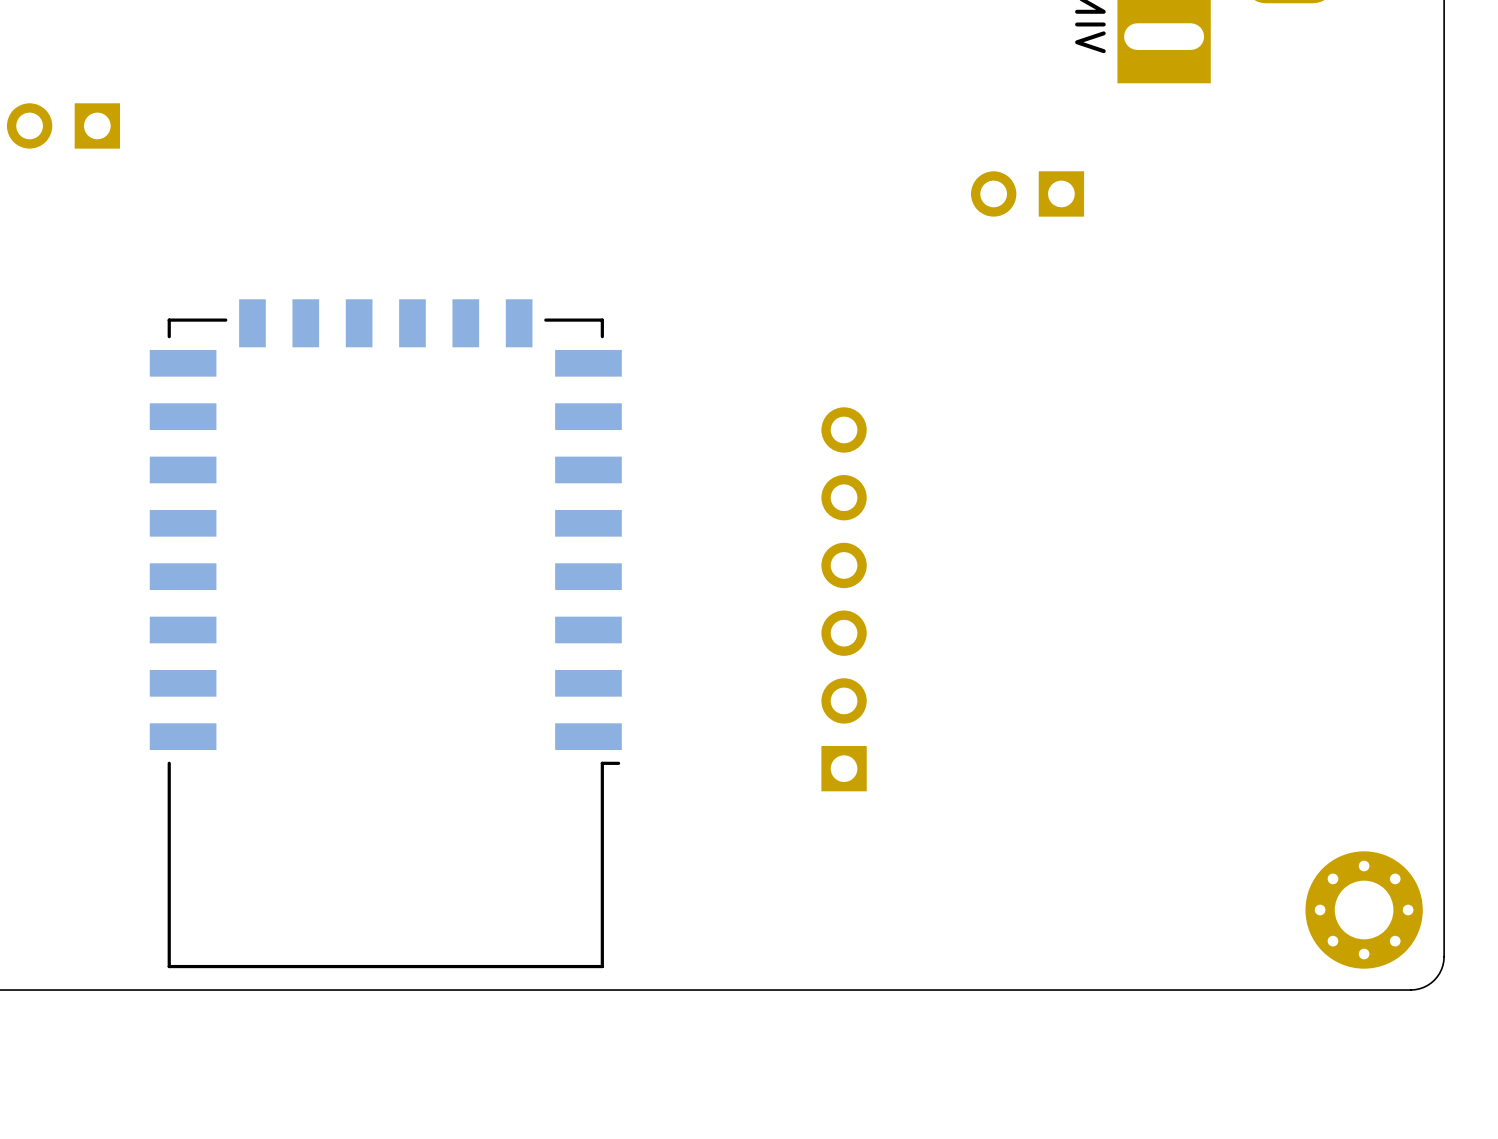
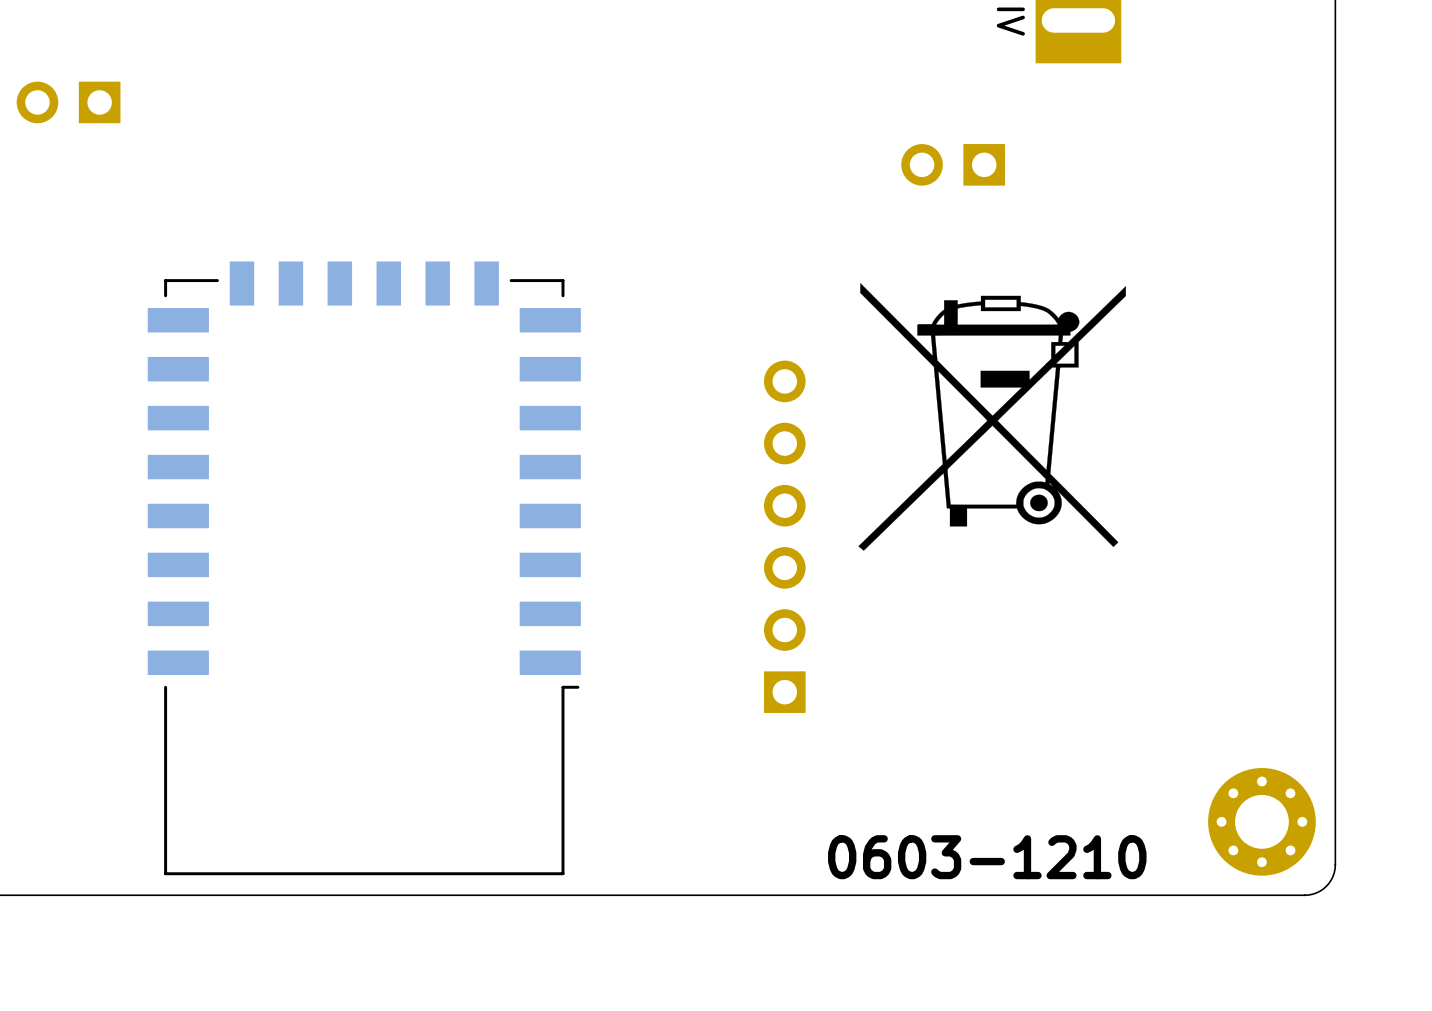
drawing: none -> [858, 283, 1126, 551]
text: none -> 0603-1210 (987, 857)

